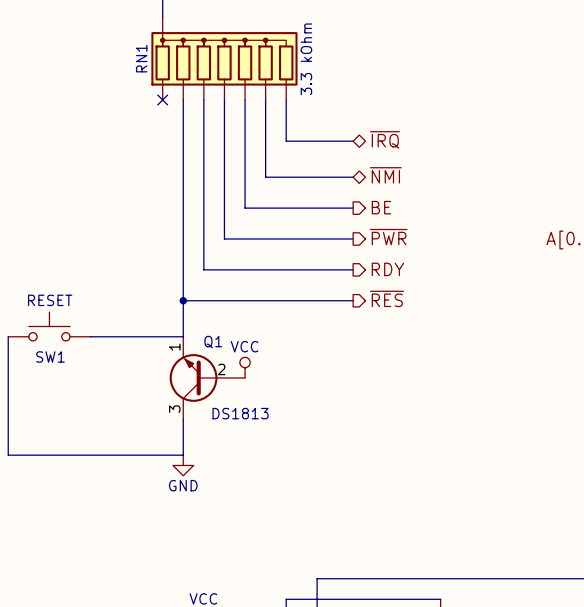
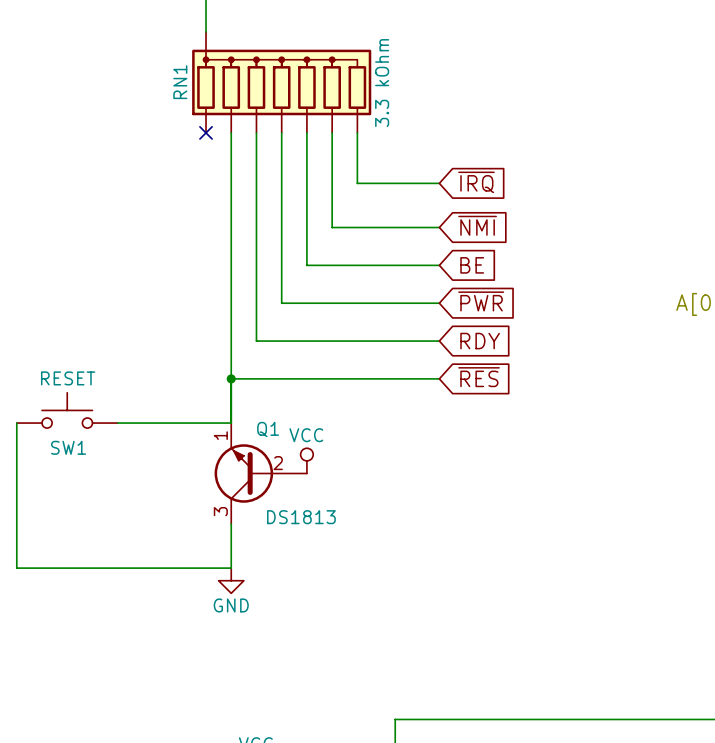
hierarchical label: ~{IRQ} (384, 139) -> none
global label: none -> ~{IRQ} (476, 182)
global label: none -> ~{NMI} (477, 225)
hierarchical label: ~{NMI} (385, 175) -> none
hierarchical label: BE (381, 207) -> none
global label: none -> BE (472, 265)
global label: none -> ~{PWR} (481, 301)
hierarchical label: ~{PWR} (388, 237) -> none
global label: none -> RDY (480, 341)
hierarchical label: RDY (387, 269) -> none
hierarchical label: ~{RES} (387, 298) -> none
global label: none -> ~{RES} (479, 377)

